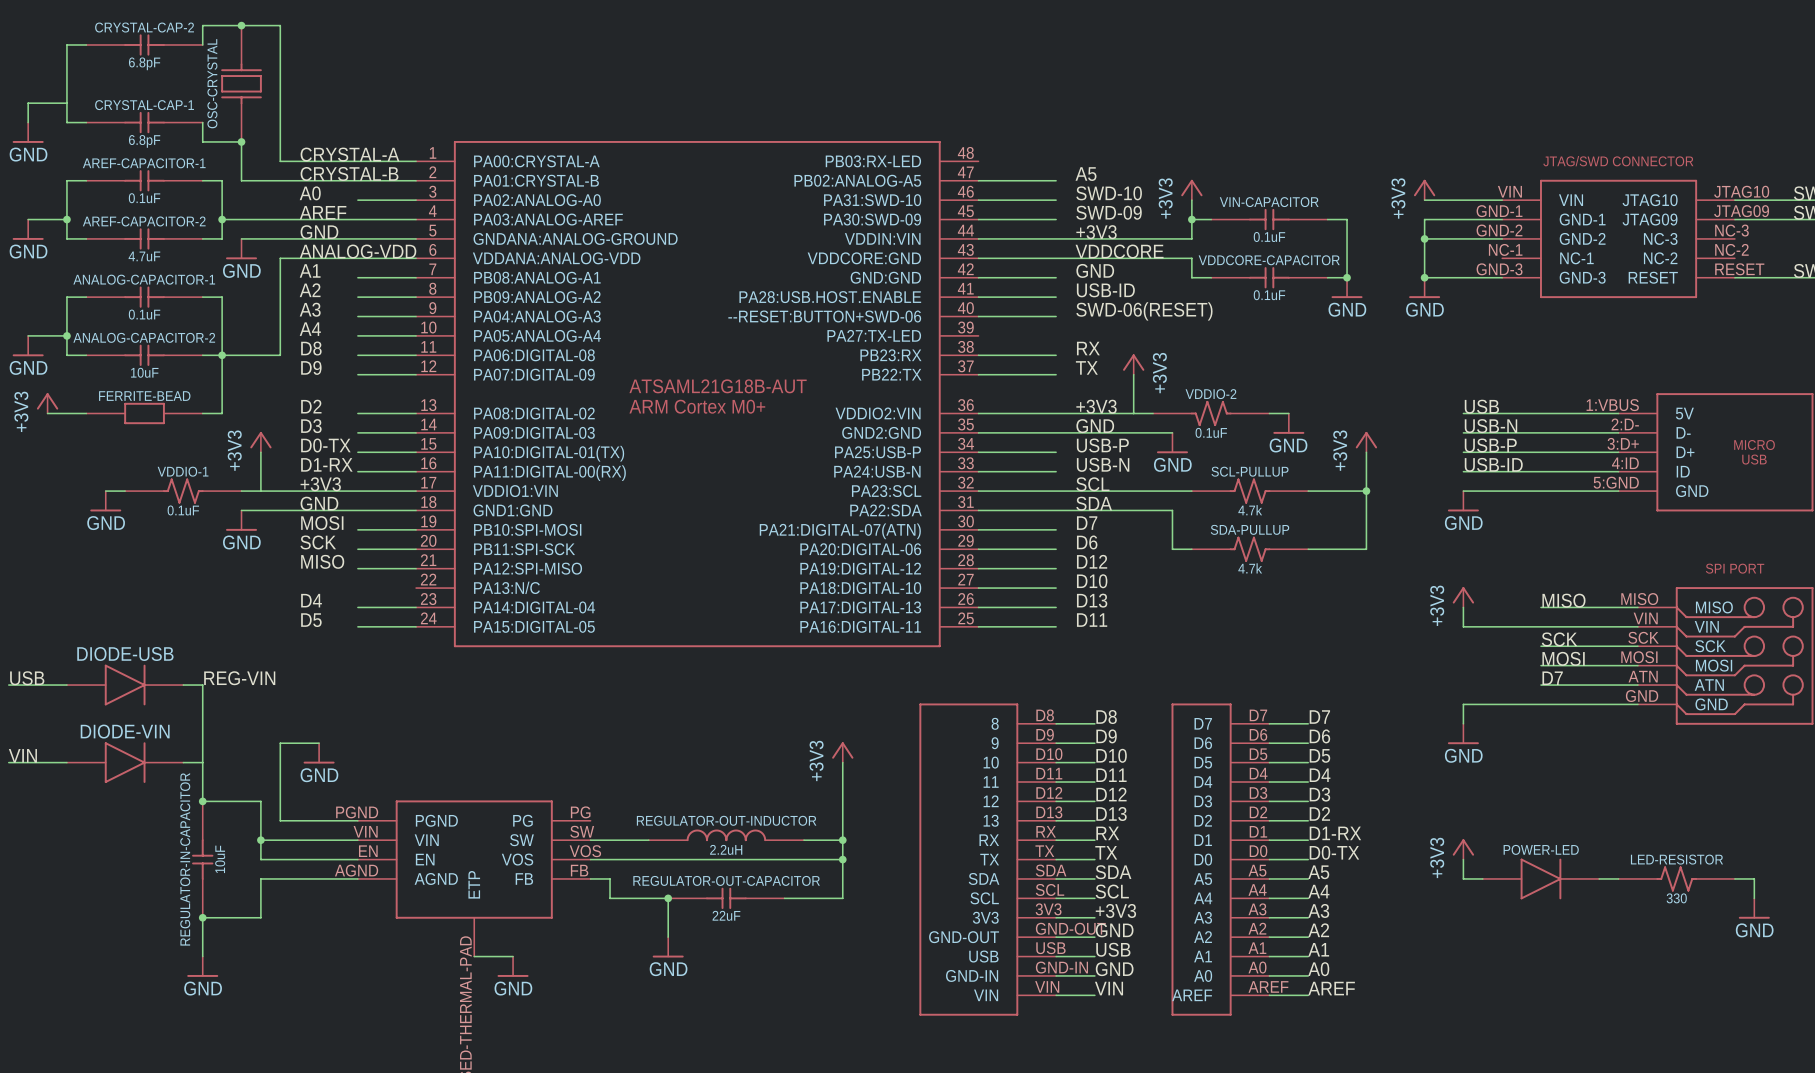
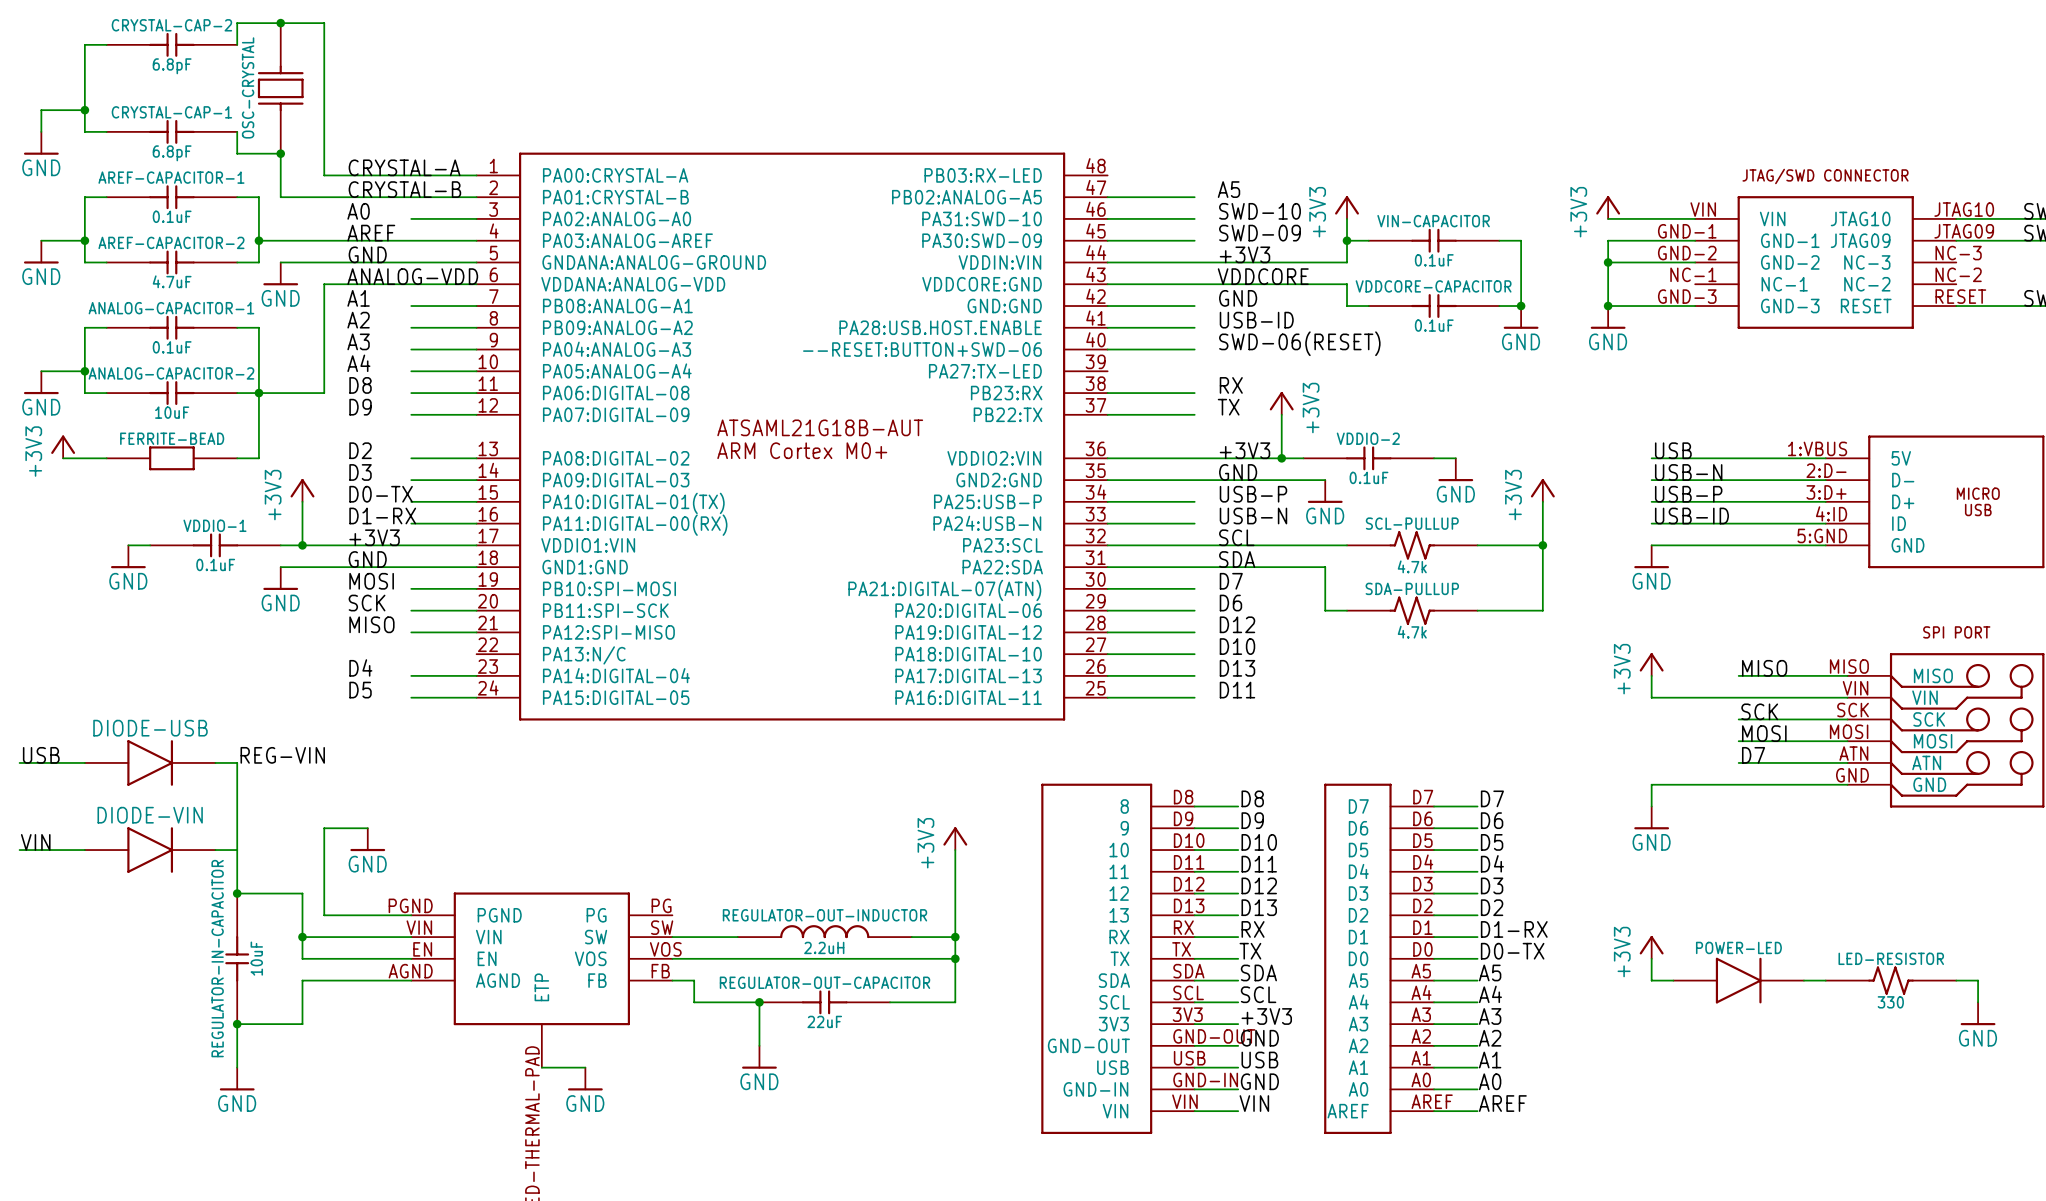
junction: none -> (84, 110)
VDDIO-2 symbol: [1153, 400, 1270, 427] -> [1303, 446, 1435, 471]
junction: none -> (1281, 458)
VDDIO-1 symbol: [125, 478, 242, 504] -> [150, 533, 281, 558]
junction: none -> (302, 545)

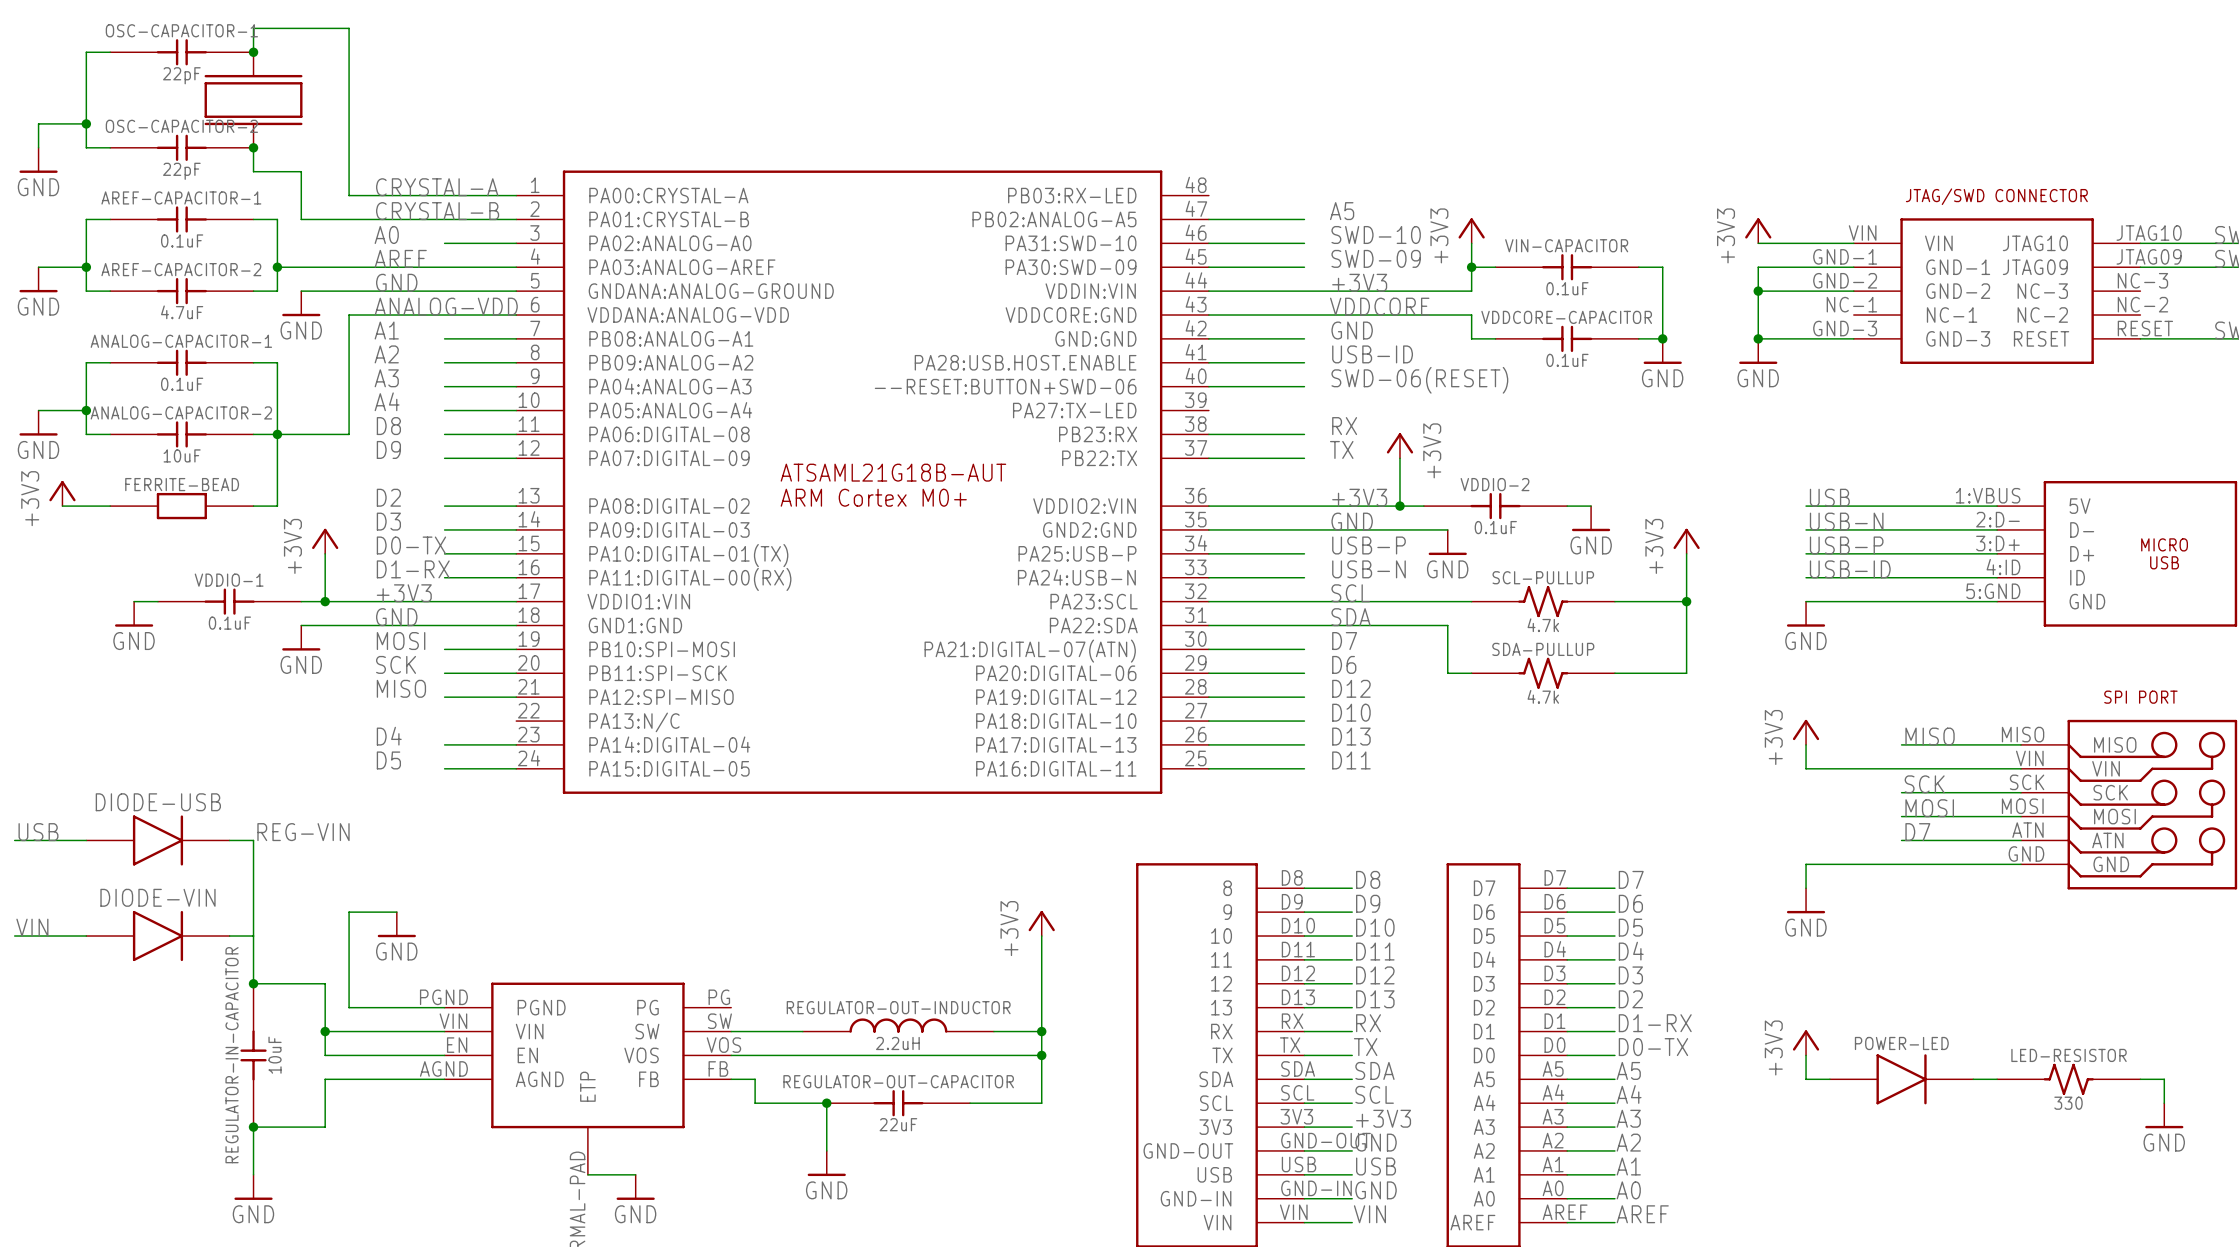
junction position: (280, 23) -> (253, 52)
CRYSTAL-CAP-2 name: CRYSTAL-CAP-2 (171, 25) -> OSC-CAPACITOR-1 (181, 30)
CRYSTAL-CAP-2 value: 6.8pF (172, 66) -> 22pF (181, 75)
part: none -> (253, 100)
OSC-CRYSTAL: (280, 88) -> none
CRYSTAL-CAP-1 name: CRYSTAL-CAP-1 (171, 112) -> OSC-CAPACITOR-2 (181, 126)
CRYSTAL-CAP-1 value: 6.8pF (172, 153) -> 22pF (181, 171)
junction position: (280, 153) -> (253, 147)

